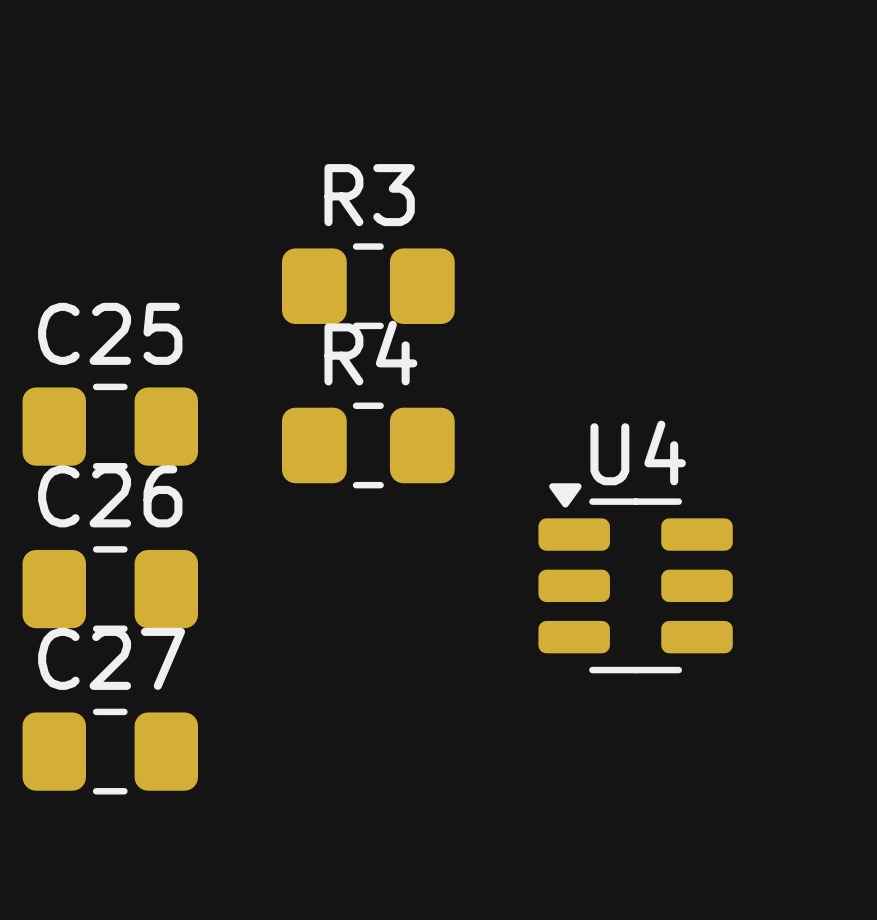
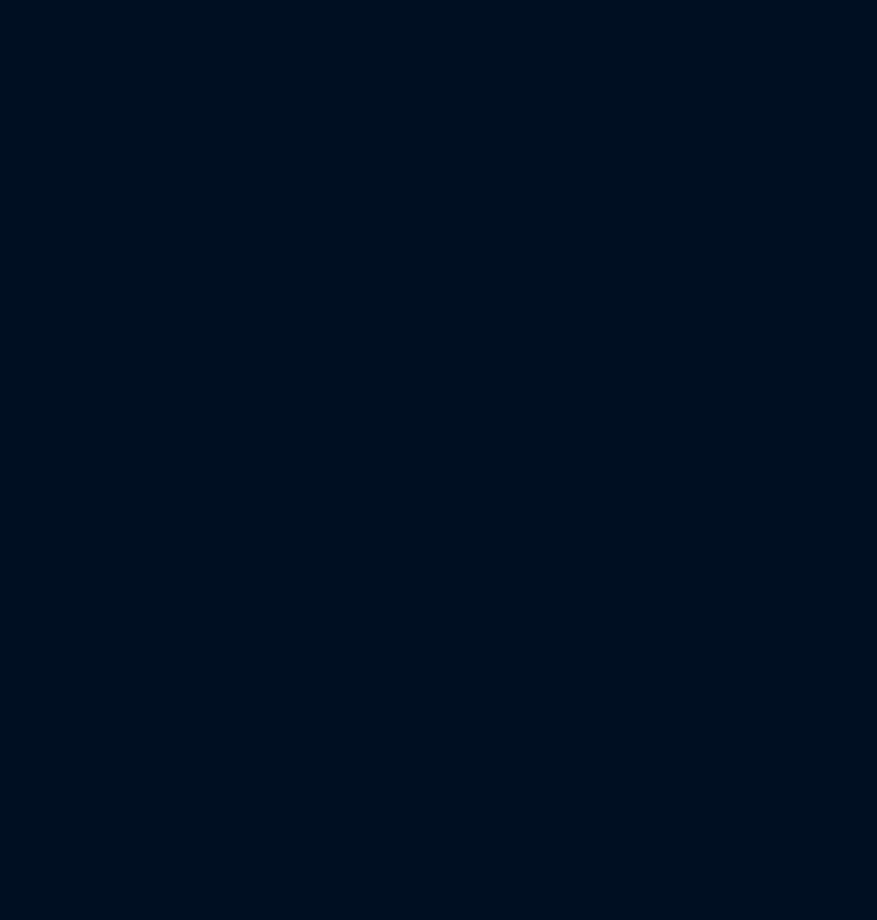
R3: (368, 286) -> none
C25: (110, 426) -> none
R4: (368, 445) -> none
U4: (635, 578) -> none
C26: (110, 589) -> none
C27: (110, 751) -> none

